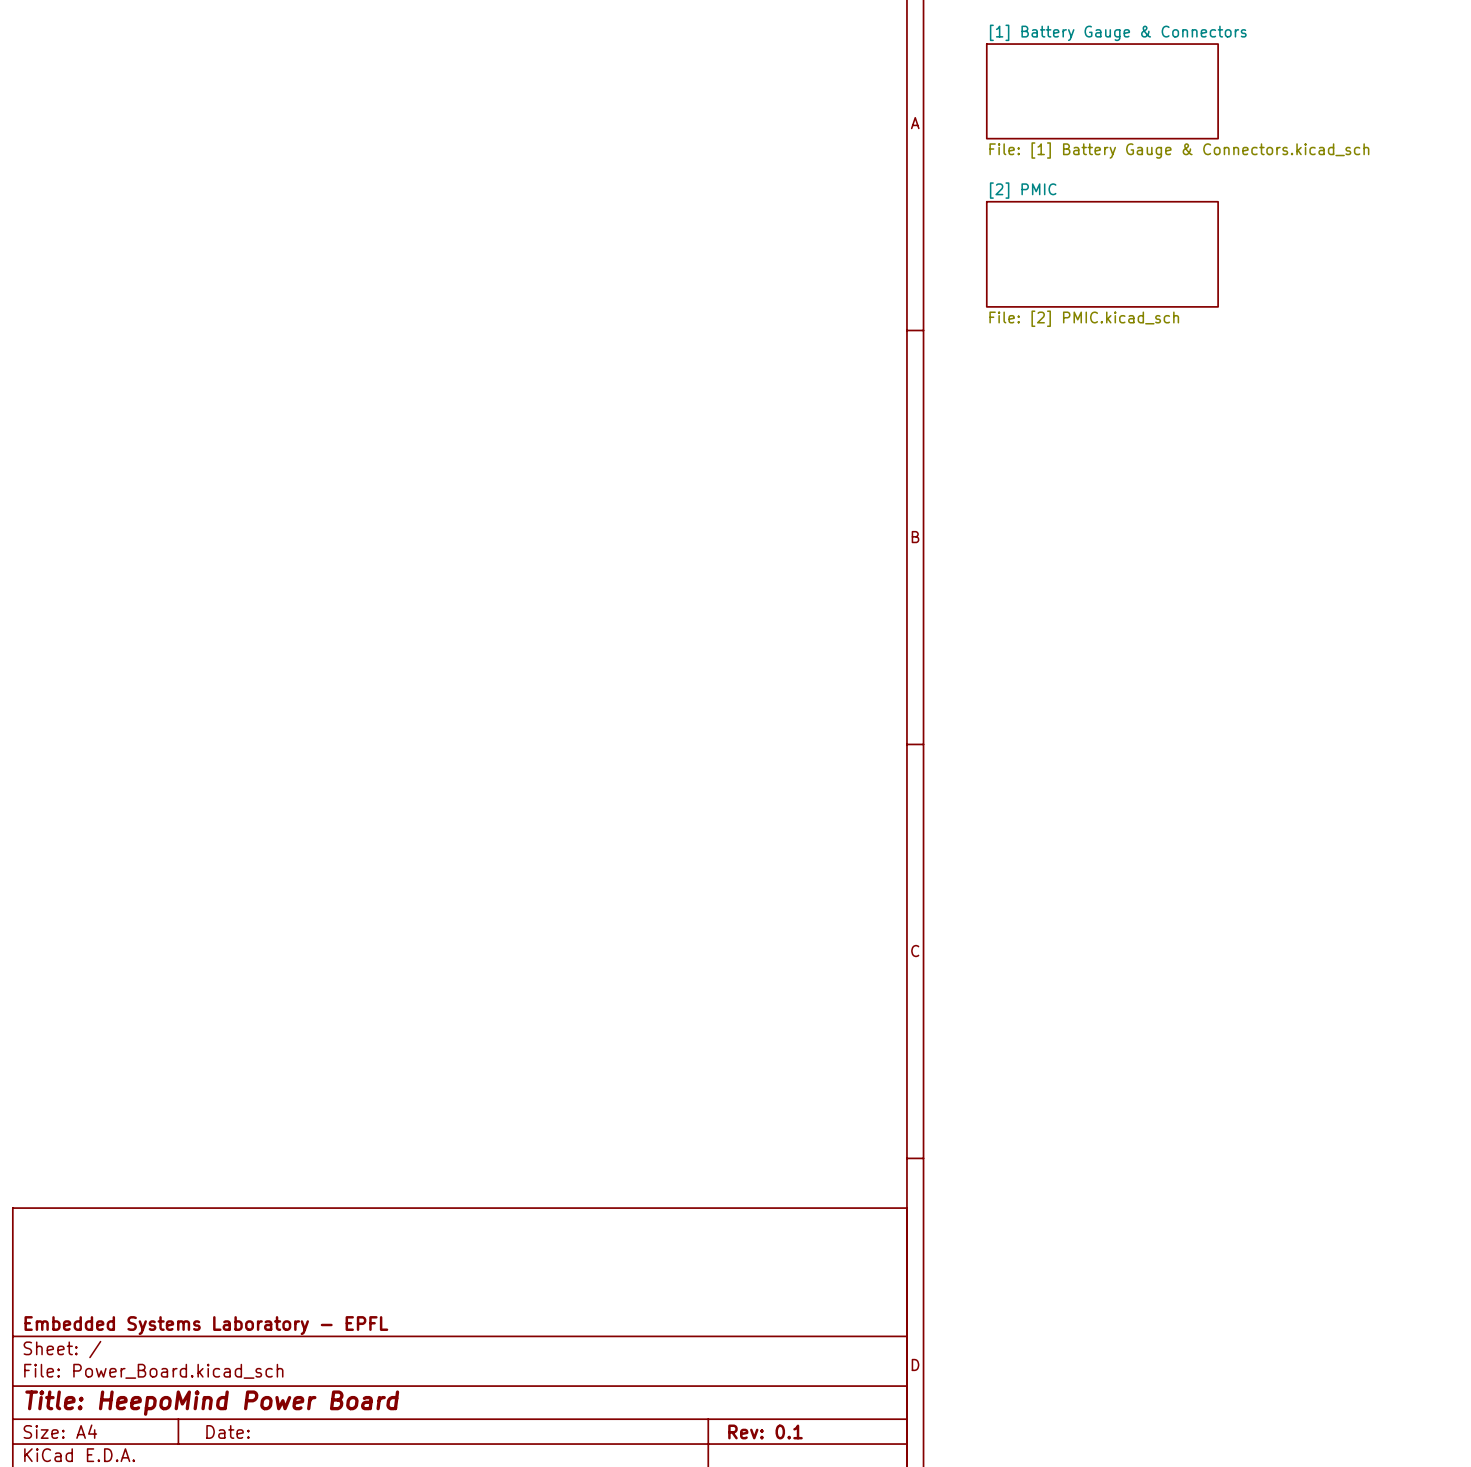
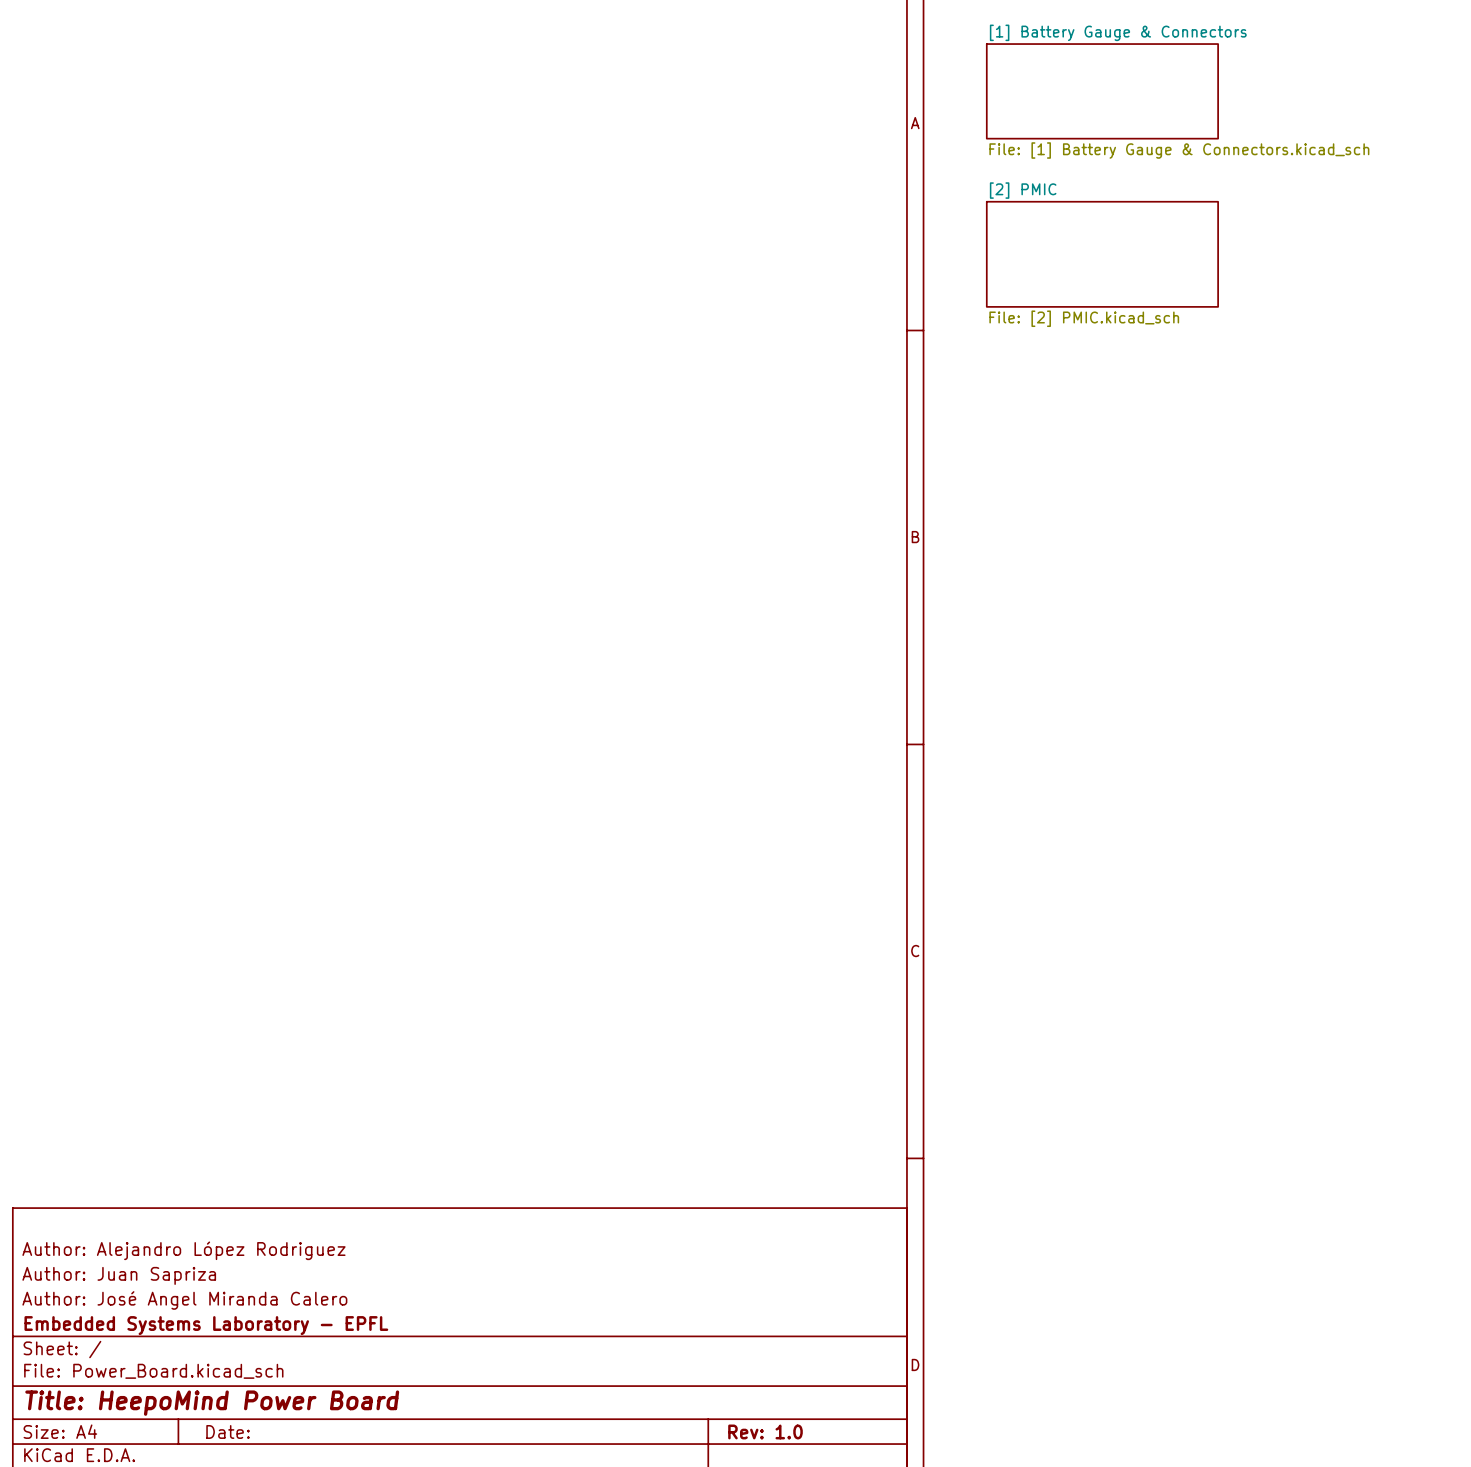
title block: none -> Author: Alejandro López Rodriguez (183, 1250)
title block: none -> Author: Juan Sapriza (119, 1275)
title block: none -> Author: José Angel Miranda Calero (184, 1300)
title block: Rev: 0.1 (765, 1431) -> Rev: 1.0 (765, 1431)

